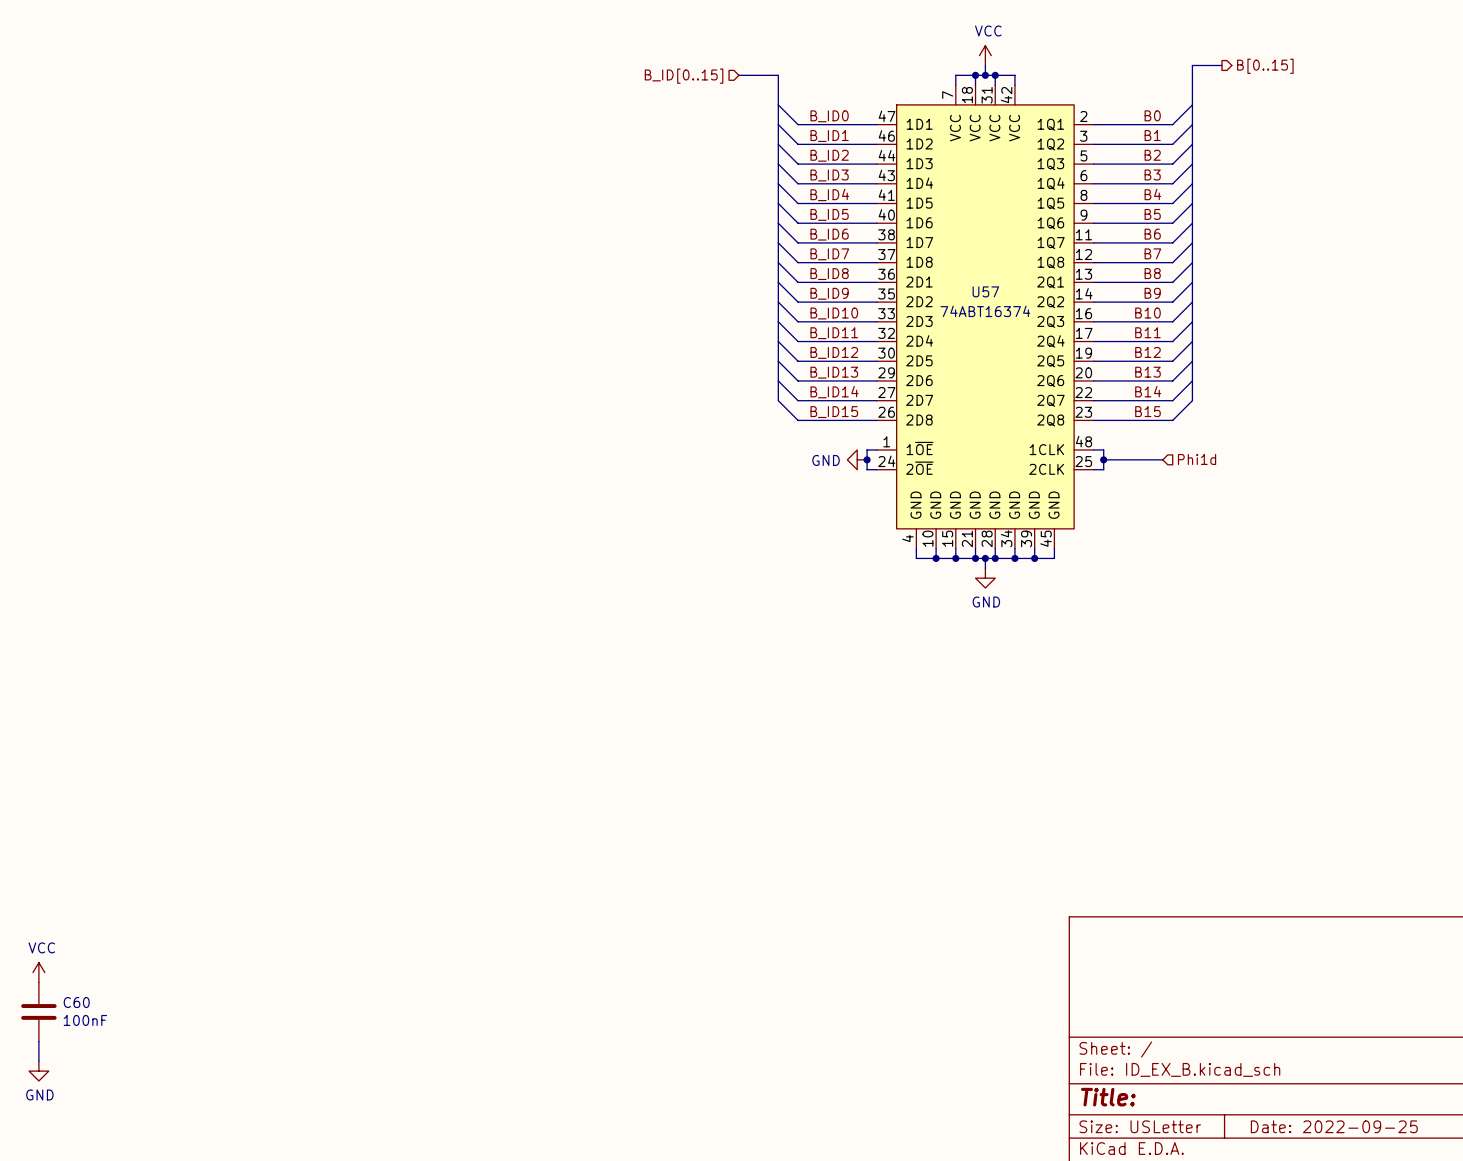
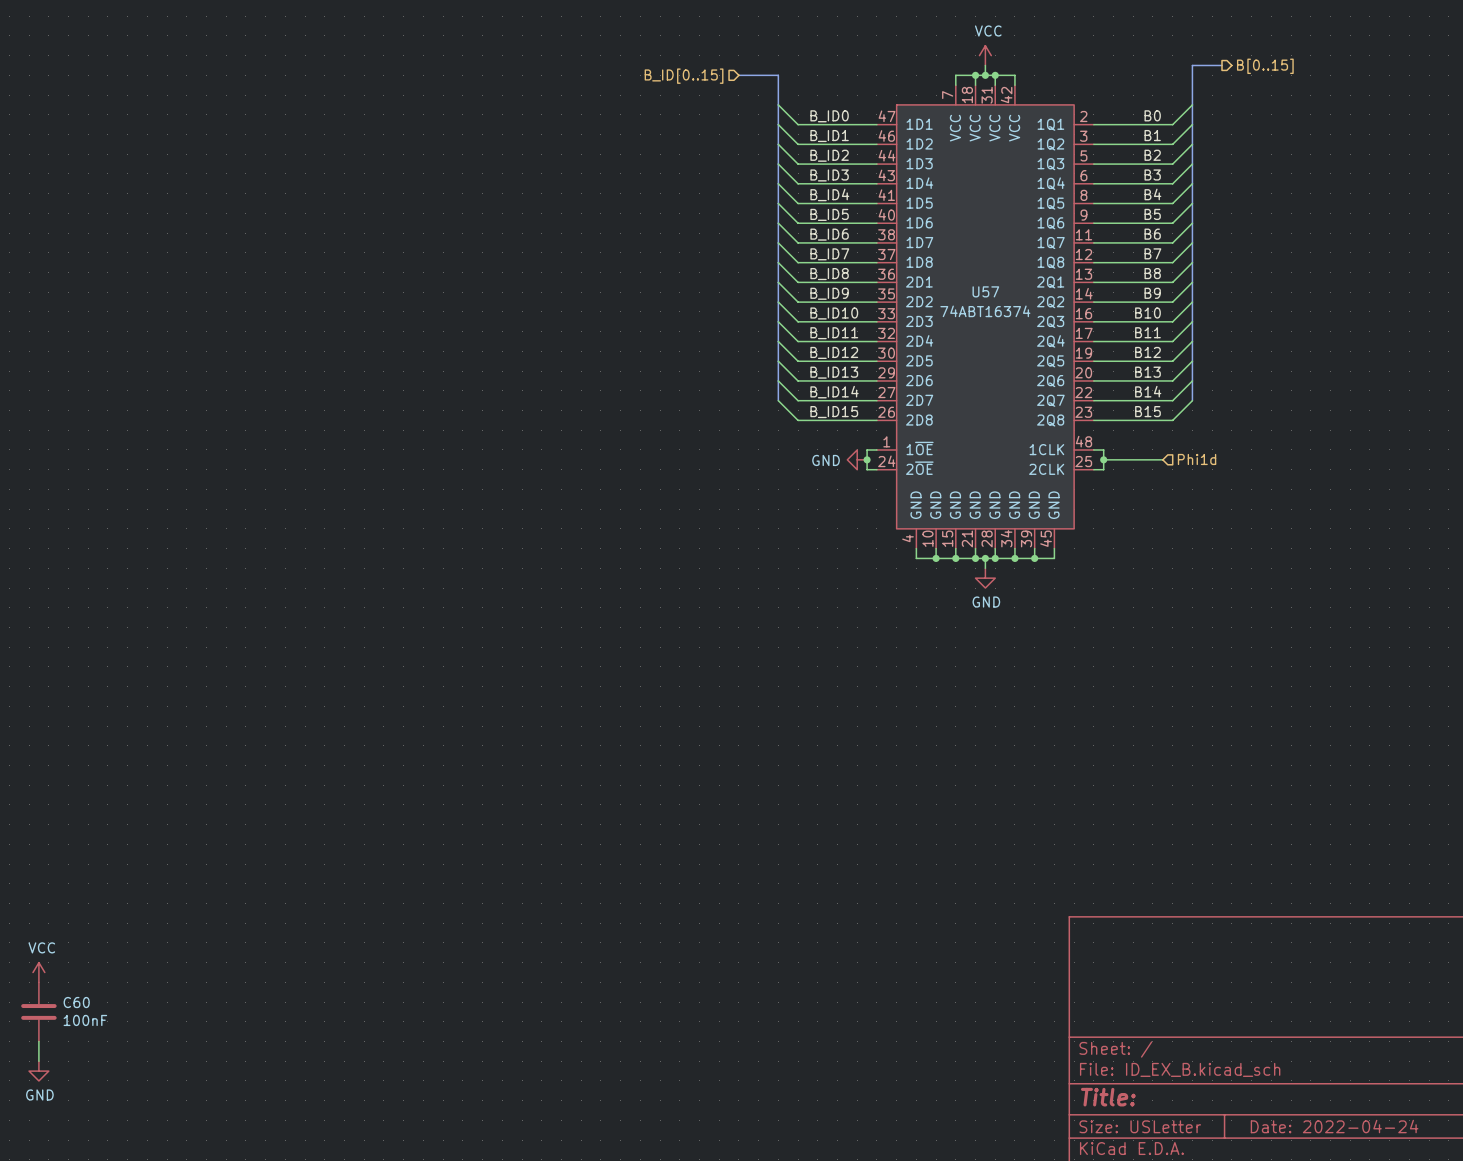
title block: Date: 2022-09-25 (1334, 1126) -> Date: 2022-04-24 (1334, 1126)

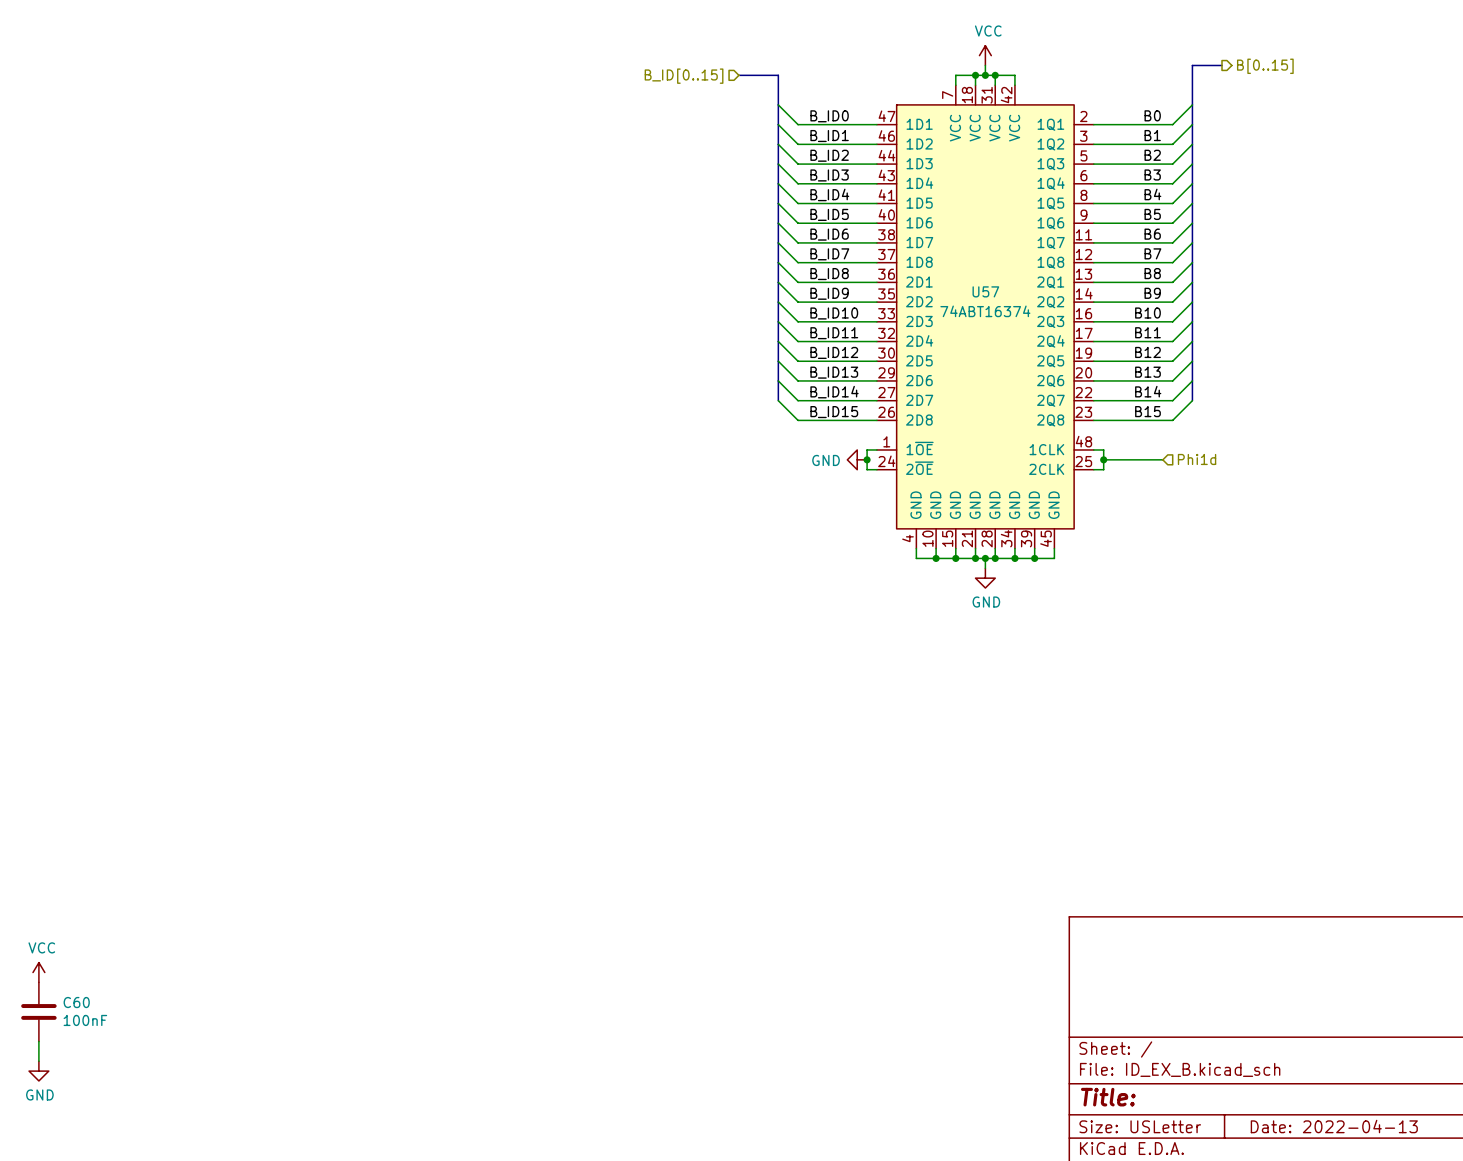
title block: Date: 2022-04-24 (1334, 1126) -> Date: 2022-04-13 (1334, 1126)

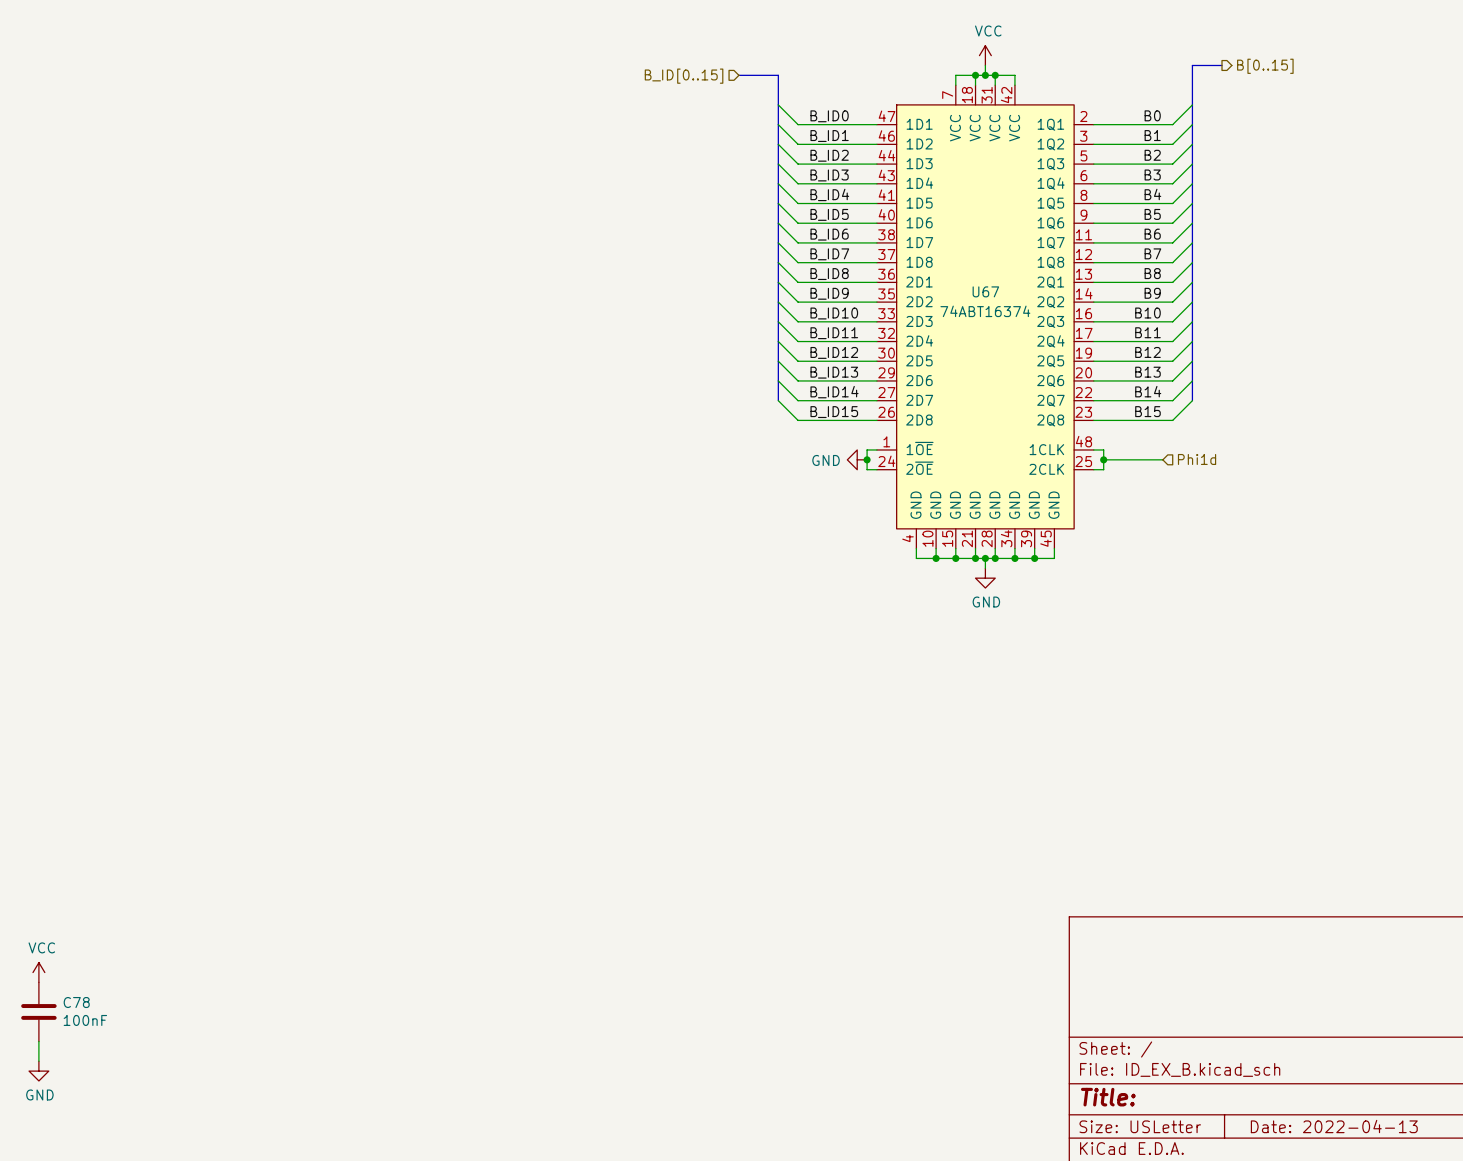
U57 name: U57 (985, 291) -> U67 (985, 291)
C60 name: C60 (76, 1002) -> C78 (76, 1002)

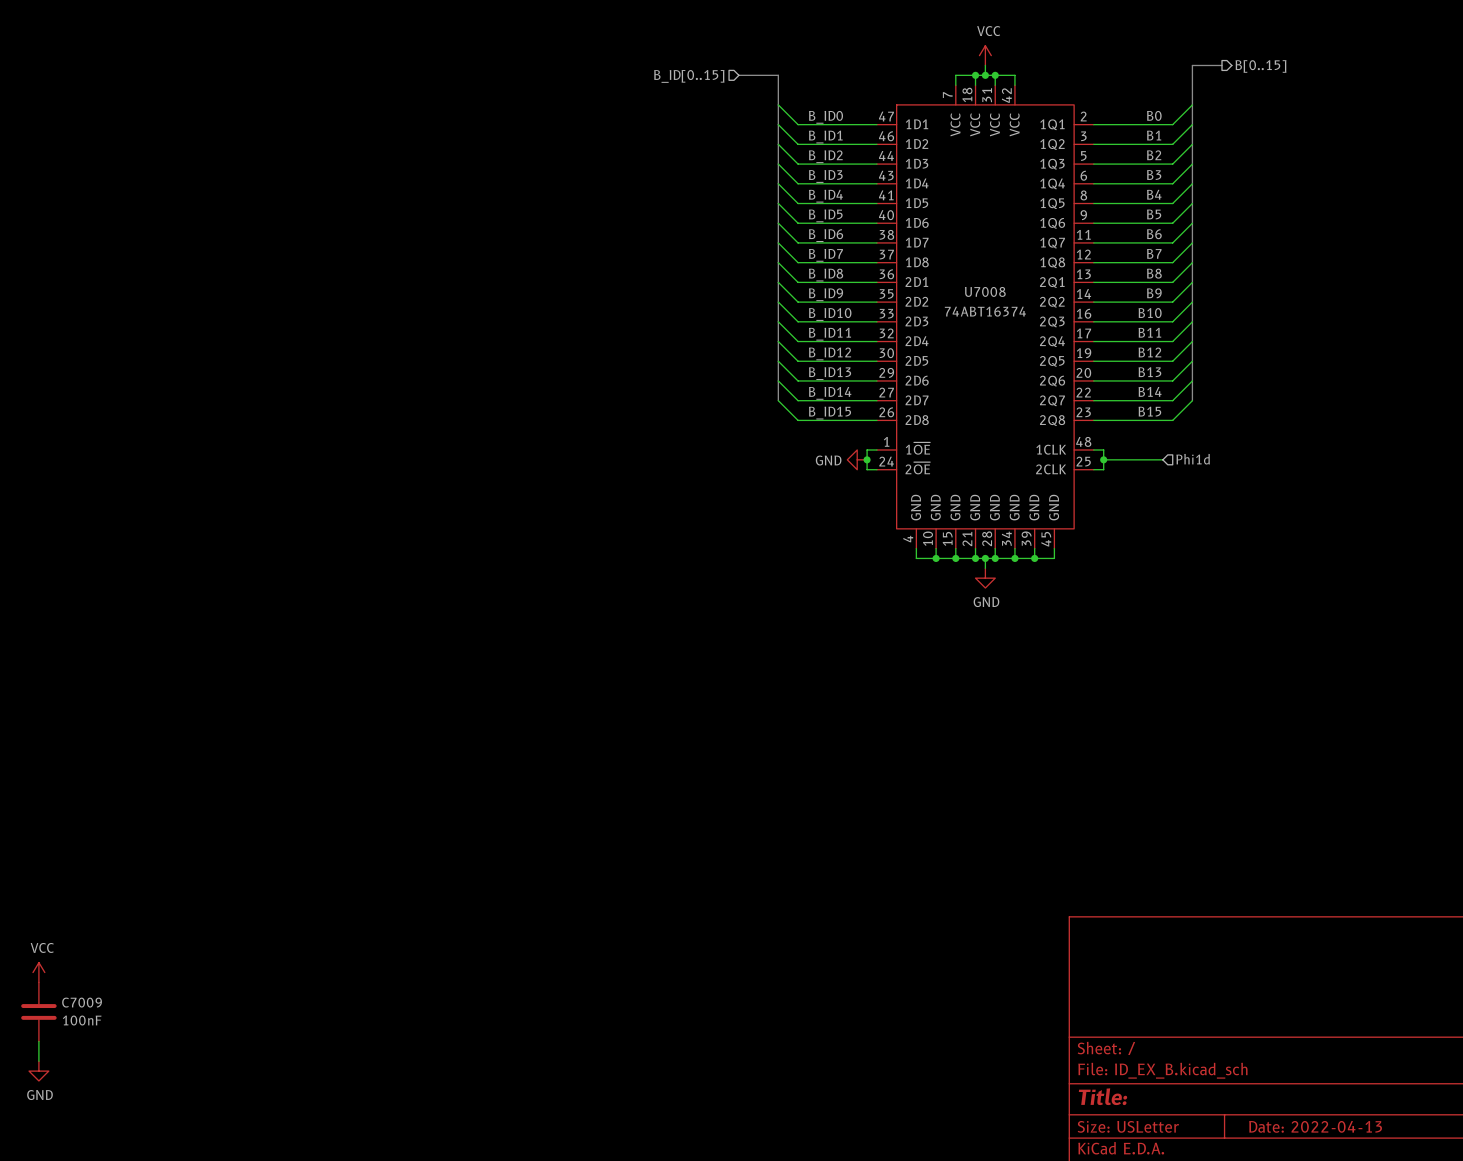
U67 name: U67 (985, 291) -> U7008 (985, 291)
C78 name: C78 (76, 1002) -> C7009 (82, 1002)

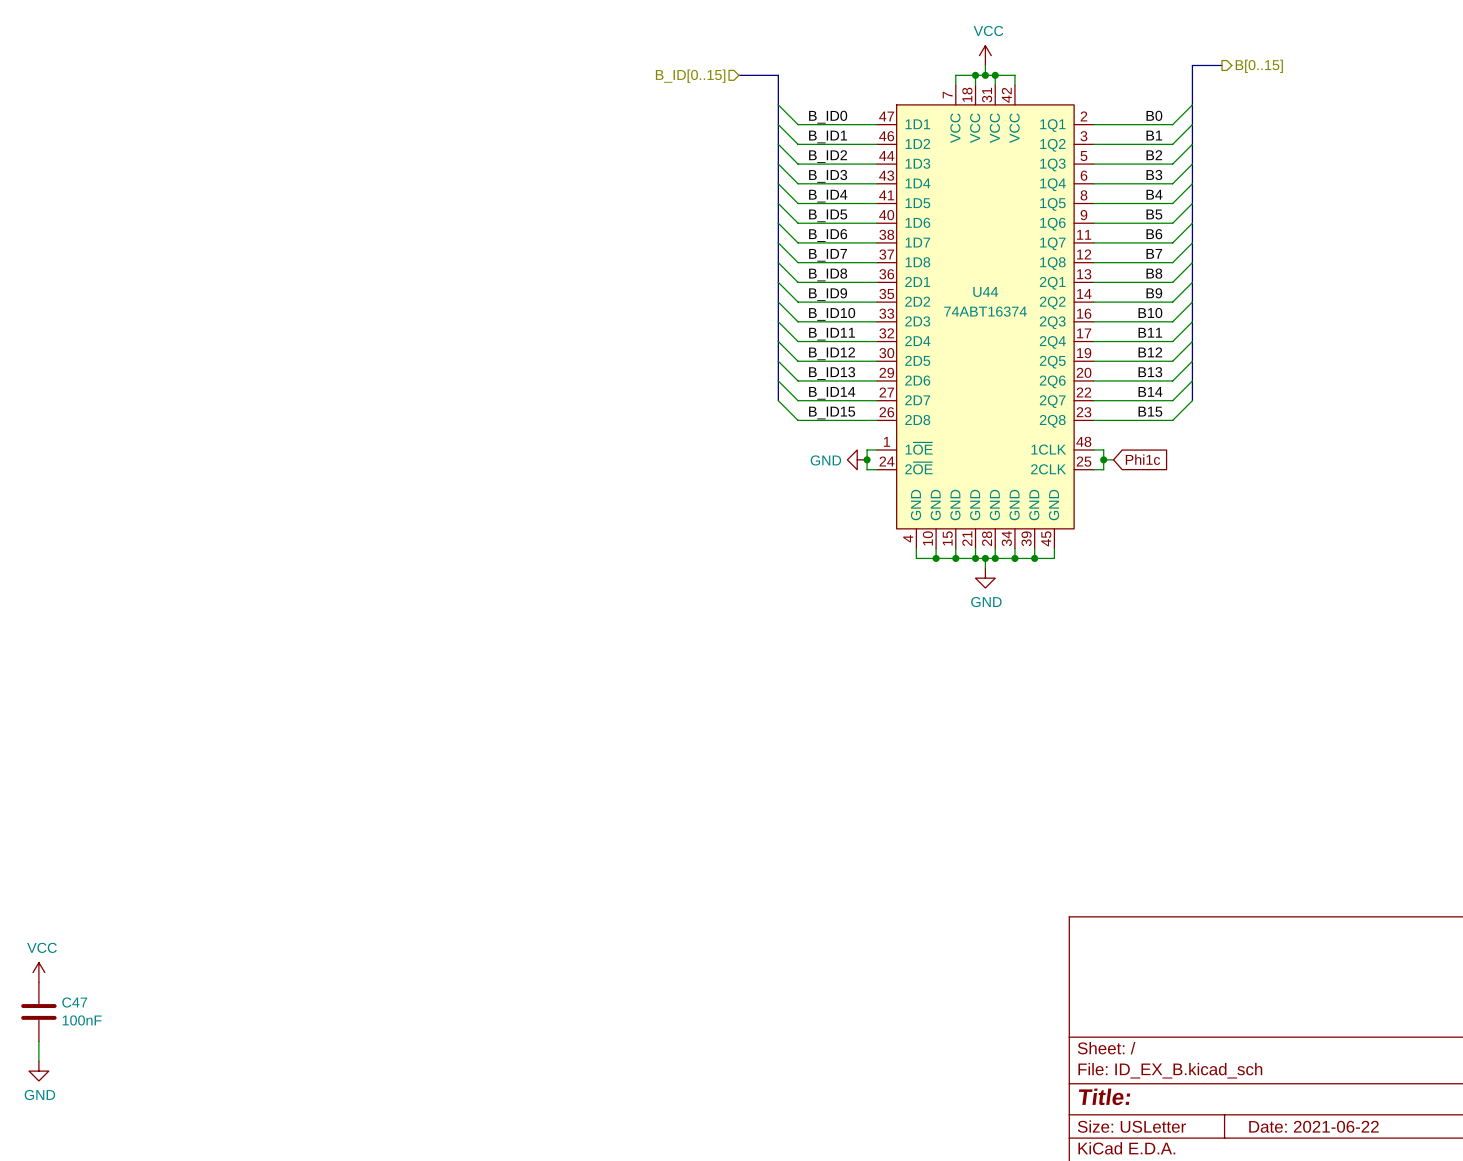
U7008 name: U7008 (985, 291) -> U44 (985, 291)
wire: (1113, 459) (1162, 459) -> none
global label: none -> Phi1c (1142, 459)
hierarchical label: Phi1d (1193, 459) -> none
C7009 name: C7009 (82, 1002) -> C47 (74, 1002)
title block: Date: 2022-04-13 (1315, 1126) -> Date: 2021-06-22 (1313, 1126)

